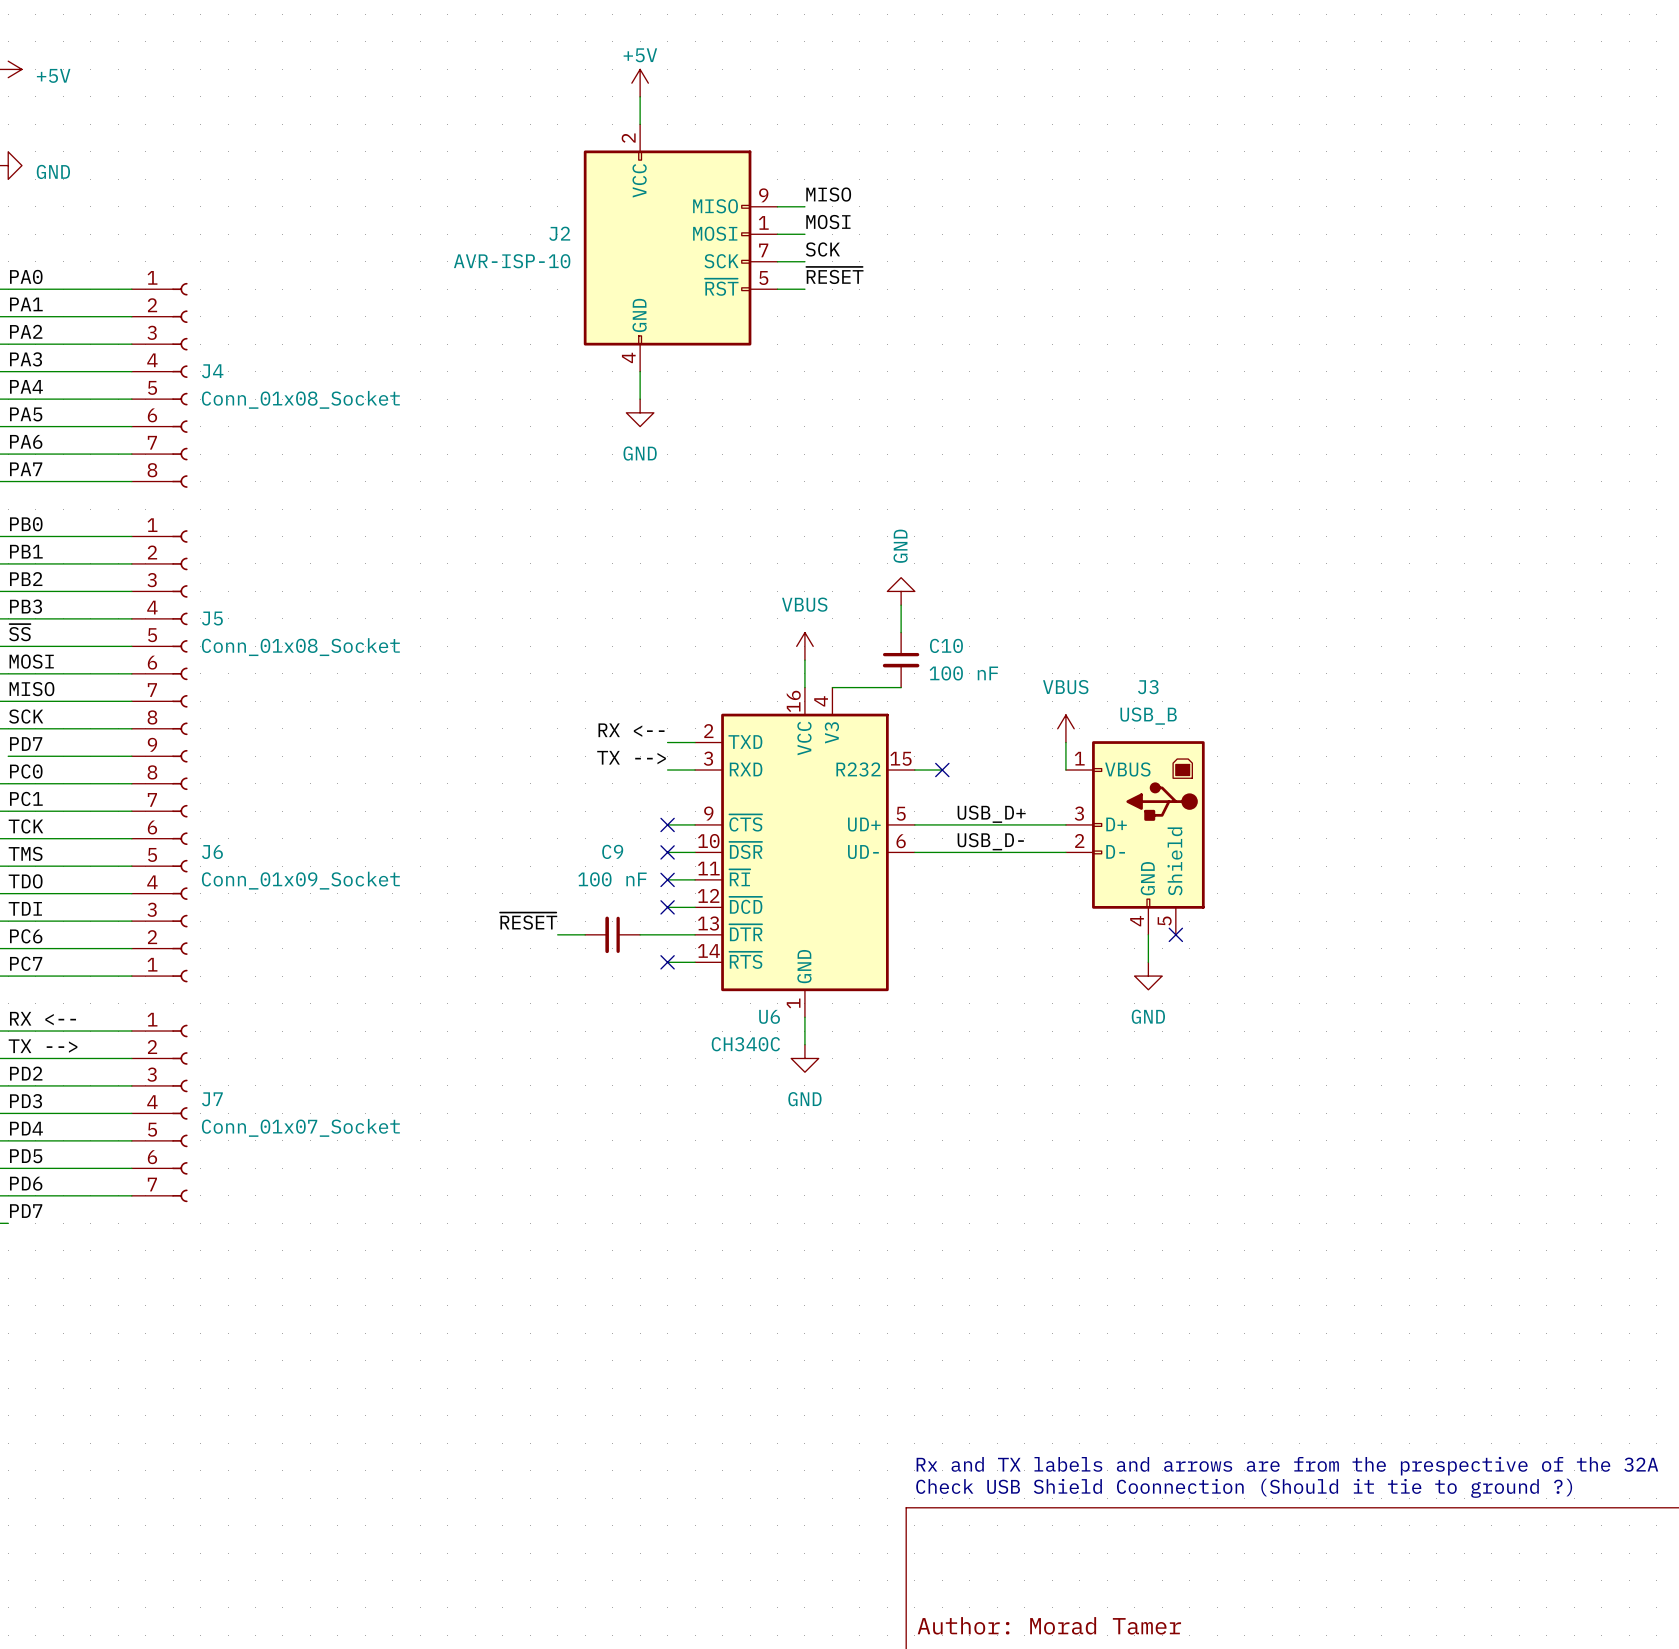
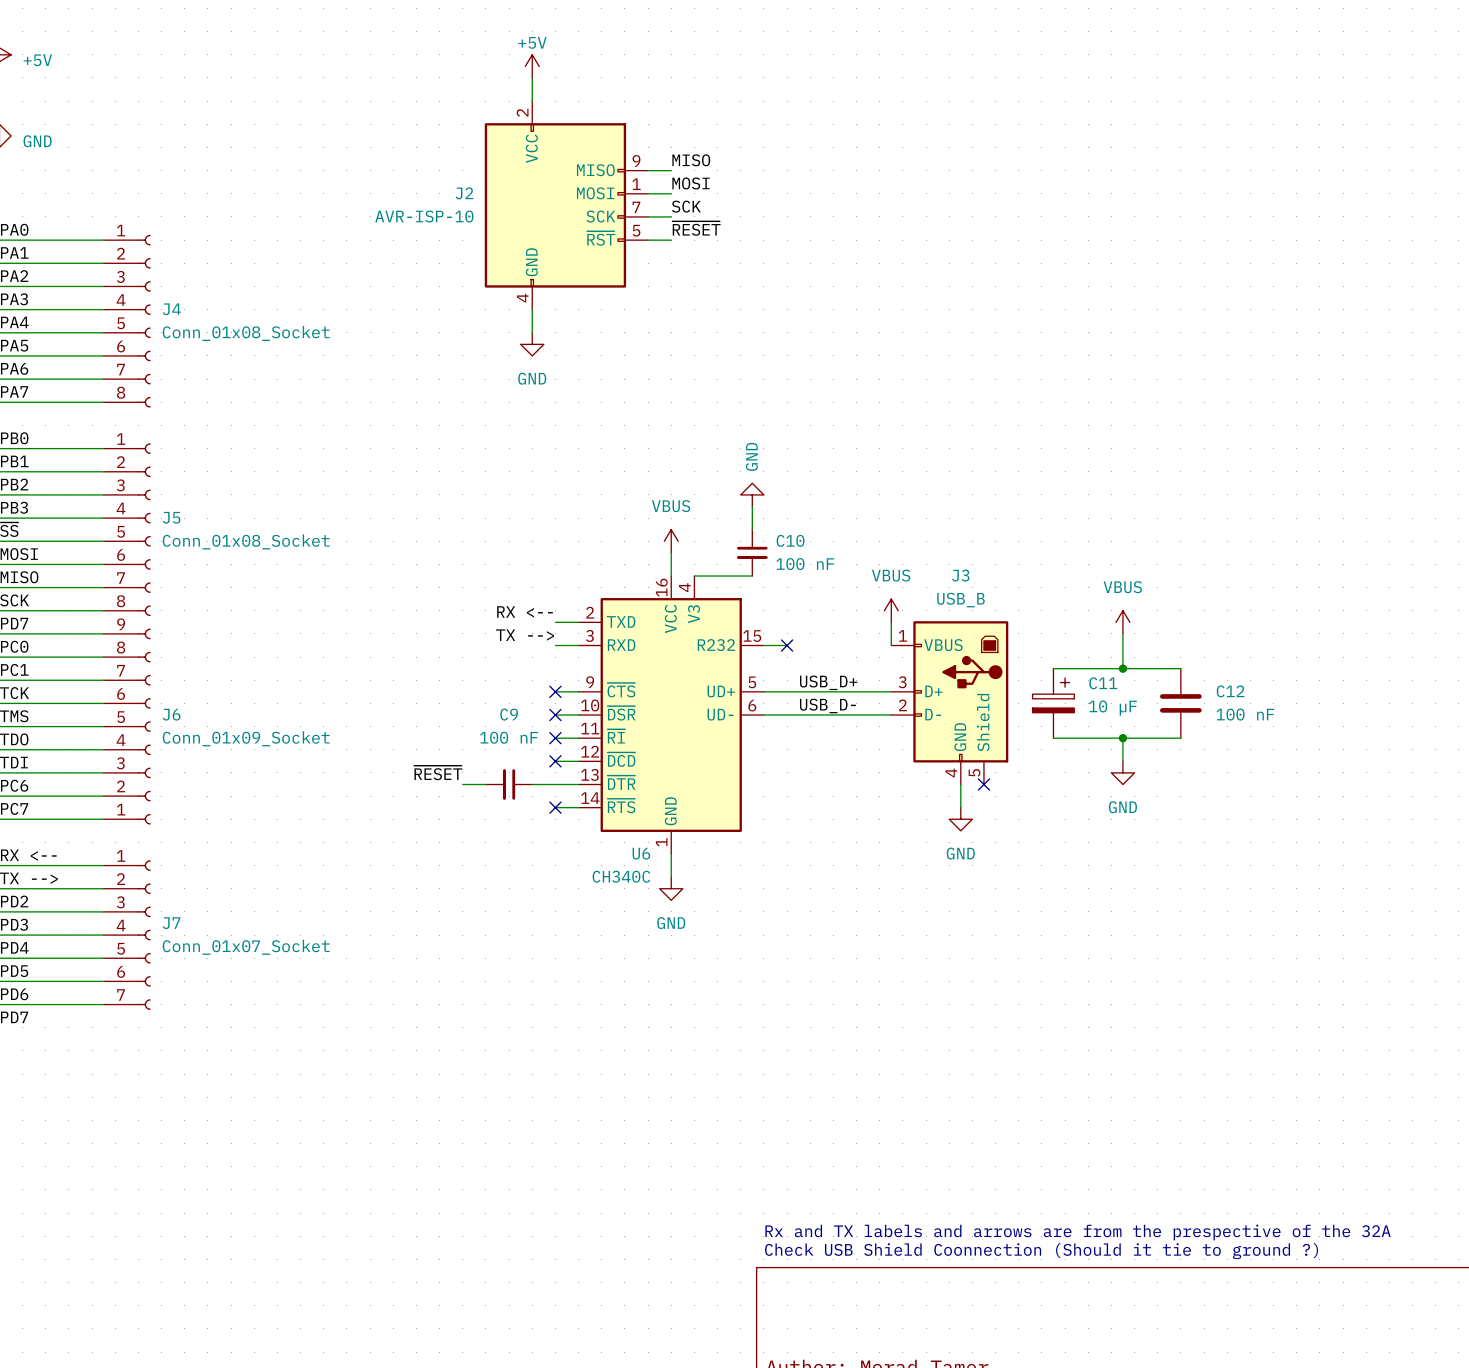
power symbol: none -> VBUS (1122, 622)
wire: none -> (1122, 633) (1122, 668)
wire: none -> (1053, 668) (1180, 668)
junction: none -> (1122, 668)
C11: none -> 10 µF (1053, 703)
C12: none -> 100 nF (1180, 703)
wire: none -> (1053, 738) (1180, 738)
wire: none -> (1122, 738) (1122, 761)
junction: none -> (1122, 738)
power symbol: none -> GND (1122, 772)

